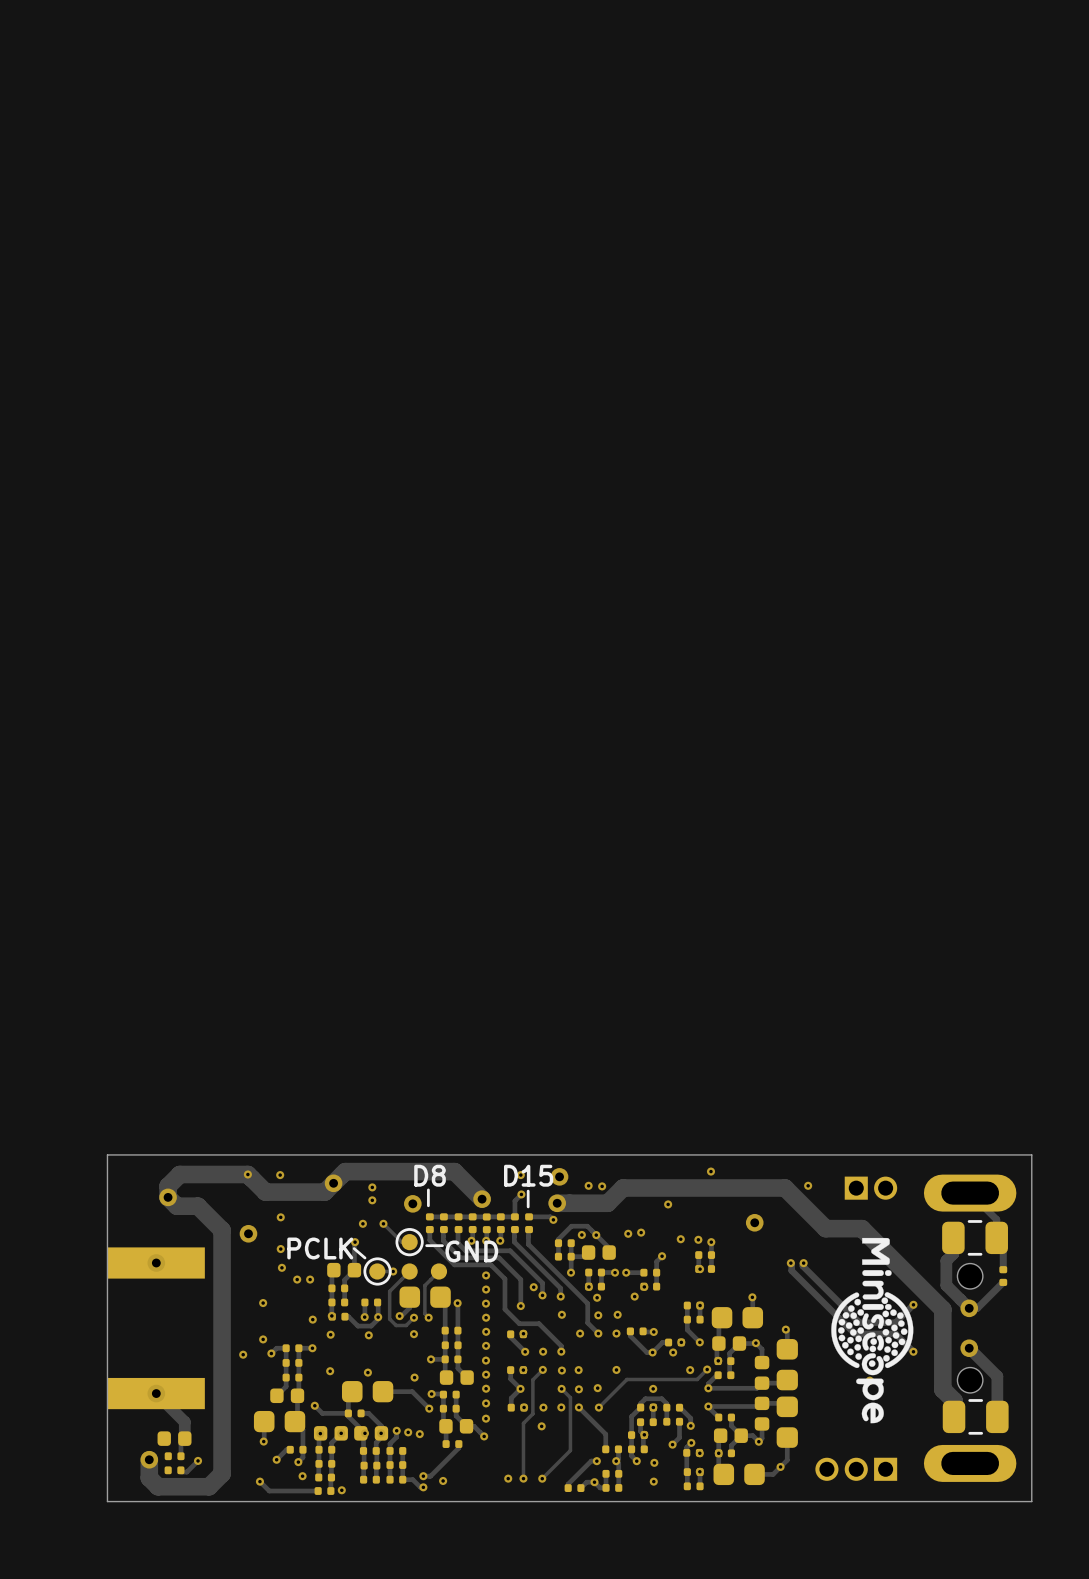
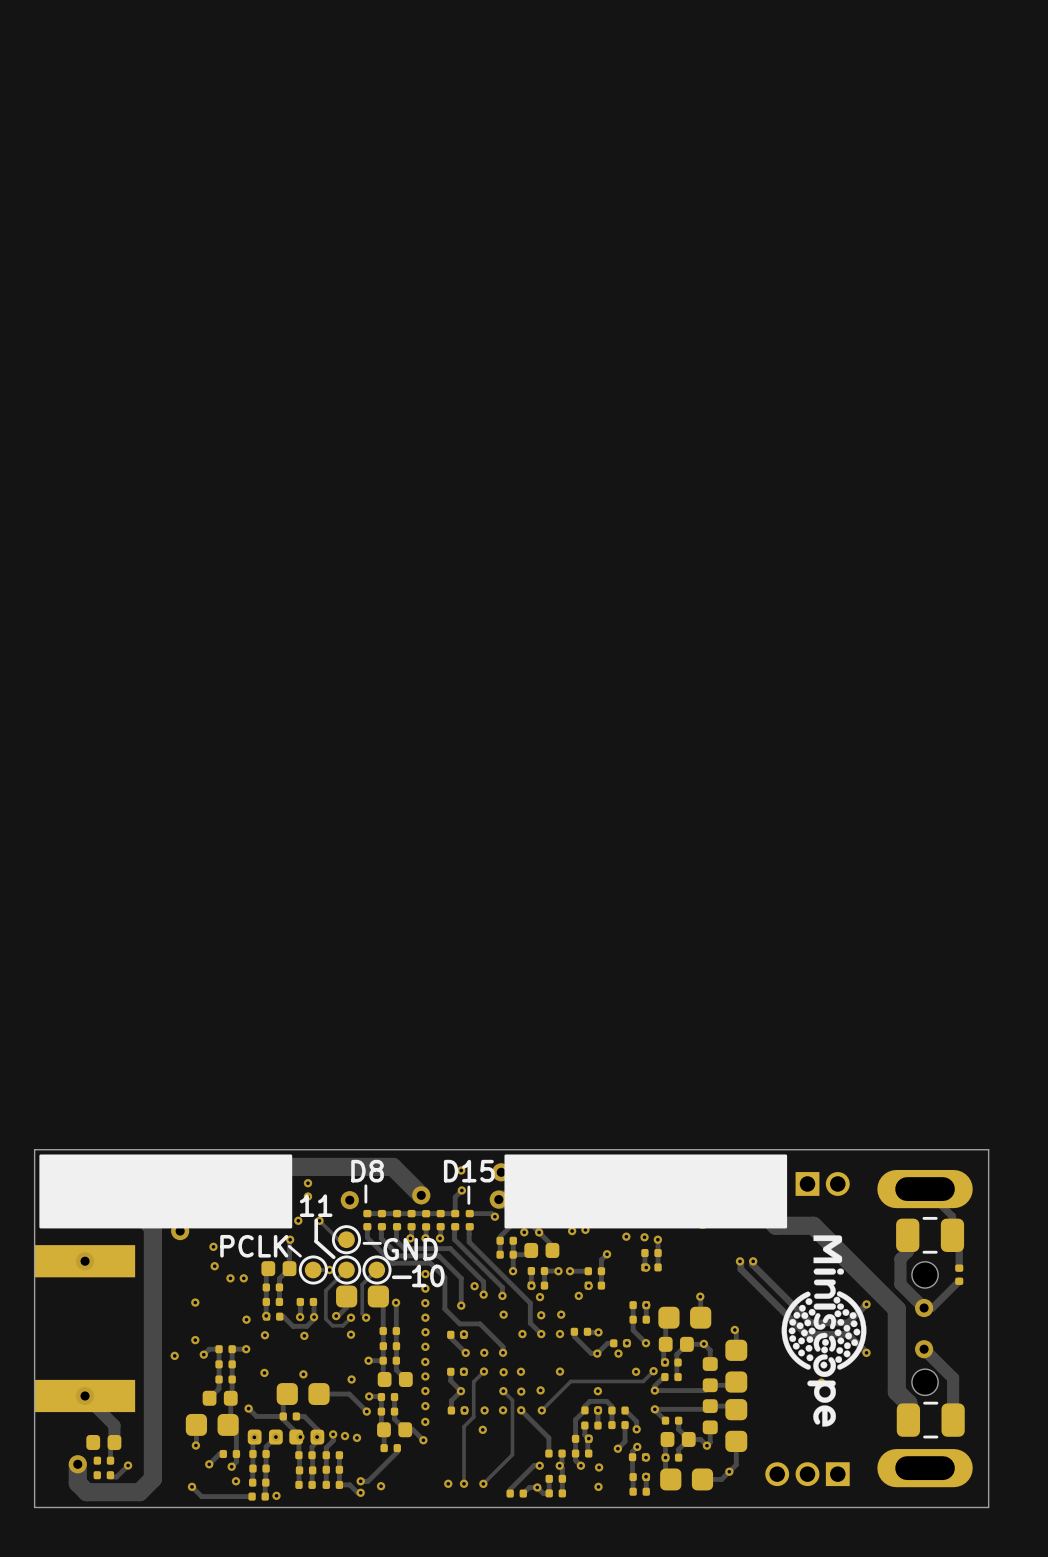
drawing: none -> [39, 1154, 293, 1229]
drawing: none -> [504, 1154, 788, 1229]
text: none -> 11 (316, 1205)
line: none -> (316, 1220) (316, 1241) (333, 1257)
drawing: none -> [332, 1255, 392, 1285]
text: none -> 10 (428, 1275)
line: none -> (410, 1277) (393, 1277)

